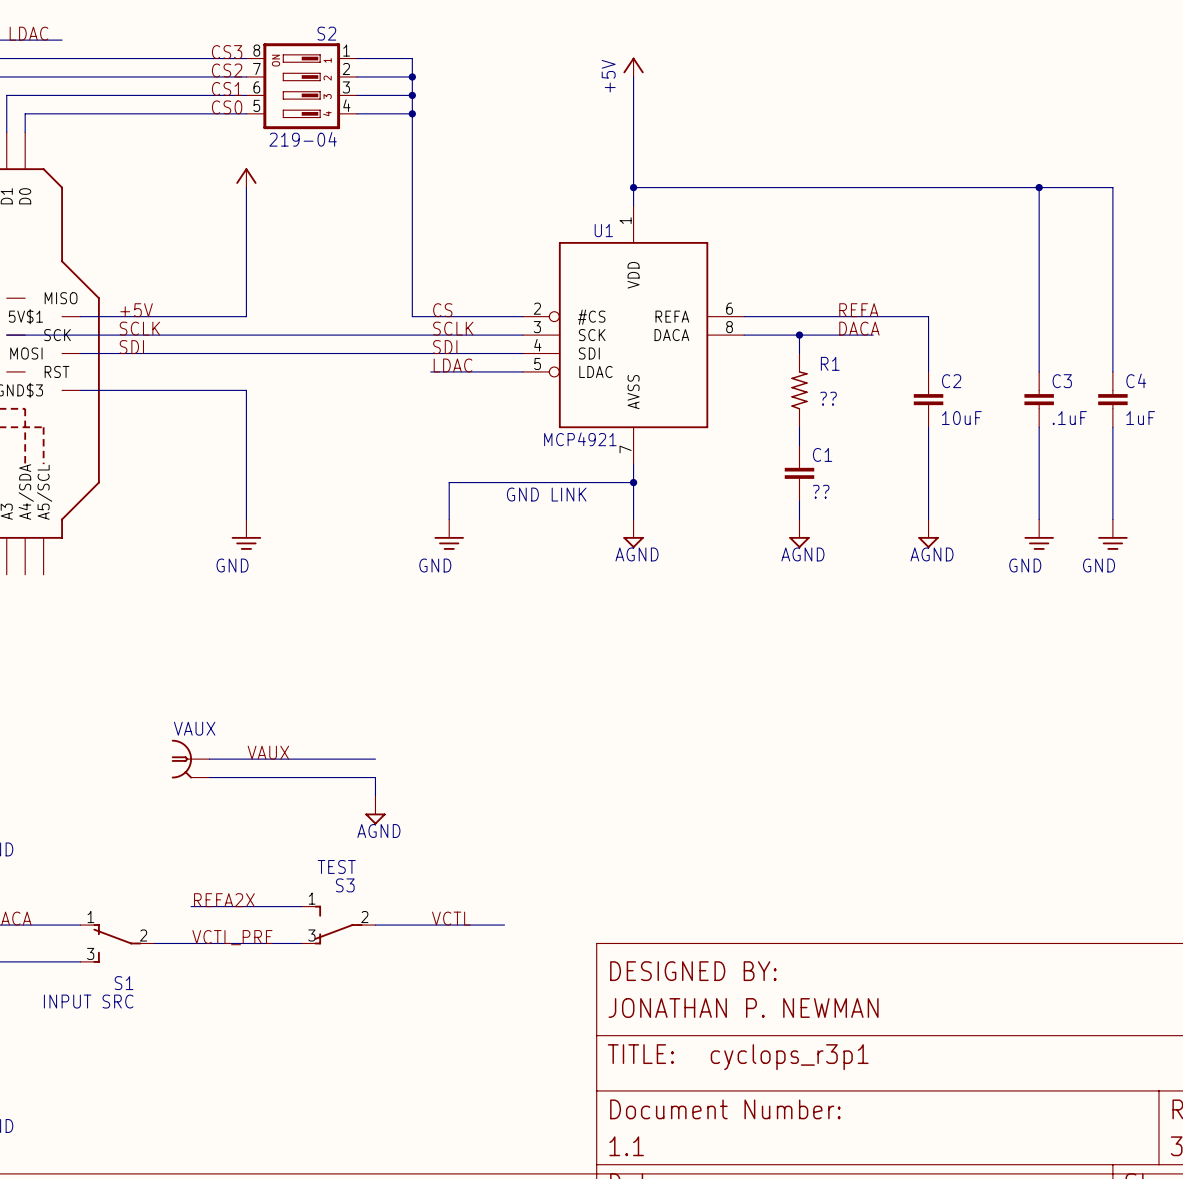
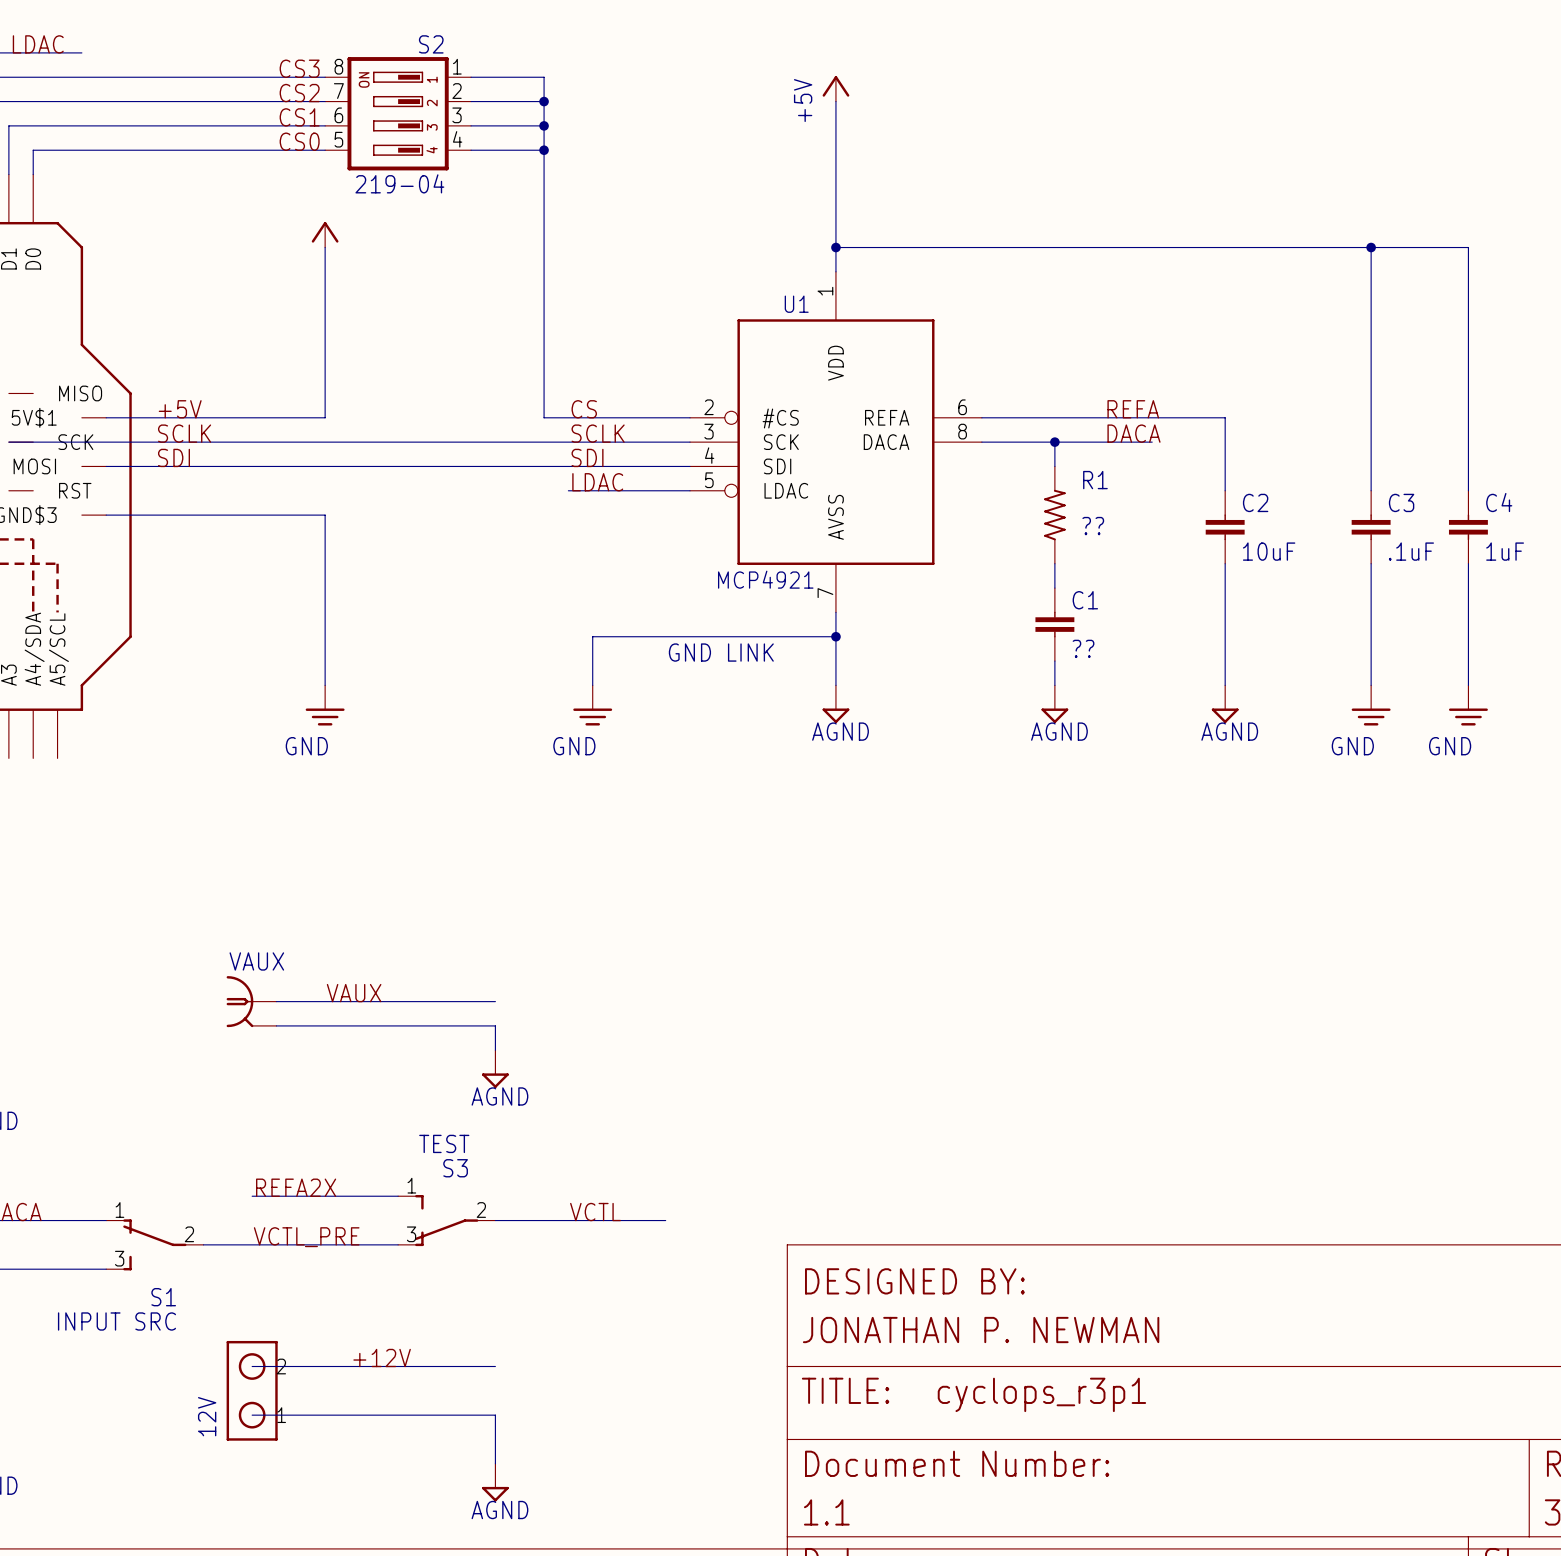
label: none -> +12V (382, 1357)
wire: none -> (252, 1366) (495, 1366)
12V: none -> (252, 1390)
wire: none -> (252, 1415) (495, 1415) (495, 1463)
power symbol: none -> AGND (495, 1482)

